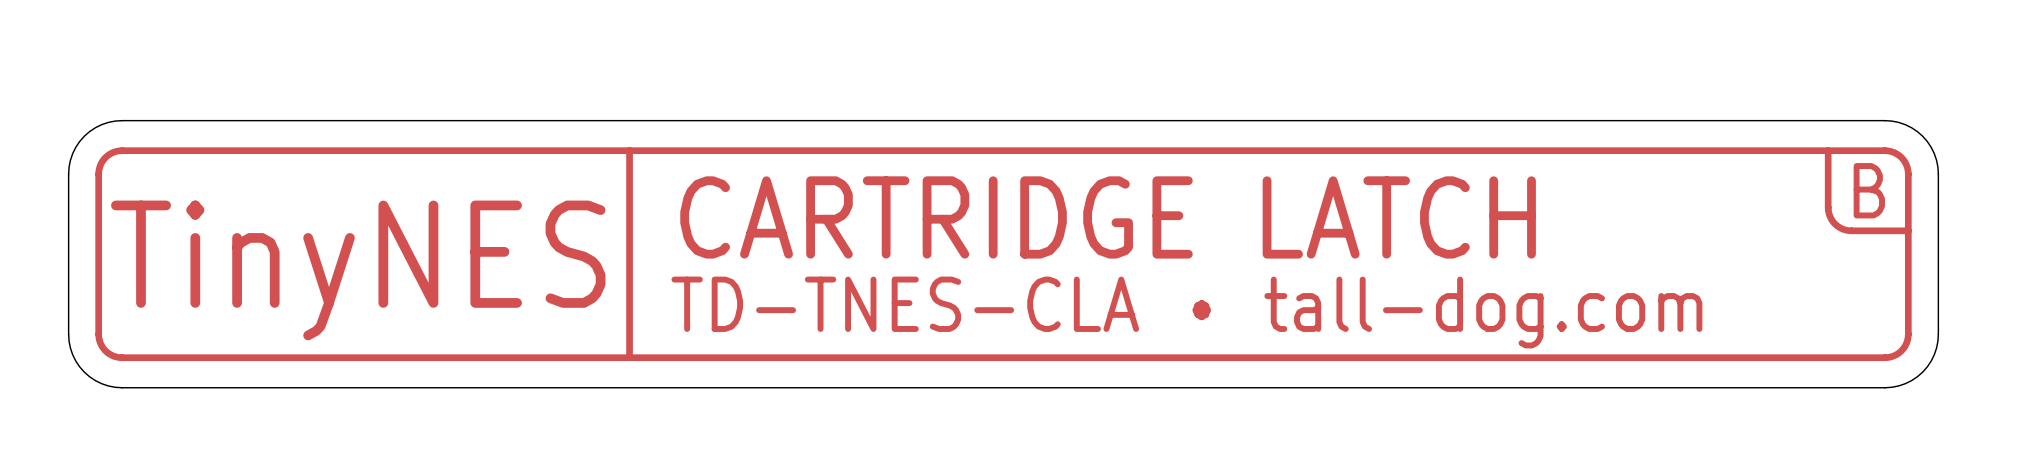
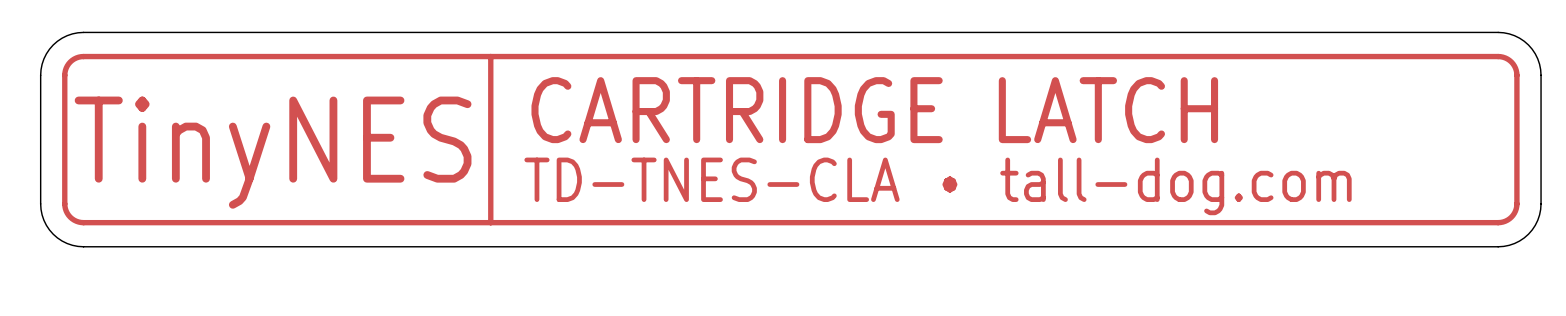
top track: (1828, 150) (1828, 210) (1835, 223) (1848, 230) (1908, 230) -> none
text: B (1869, 190) -> none

